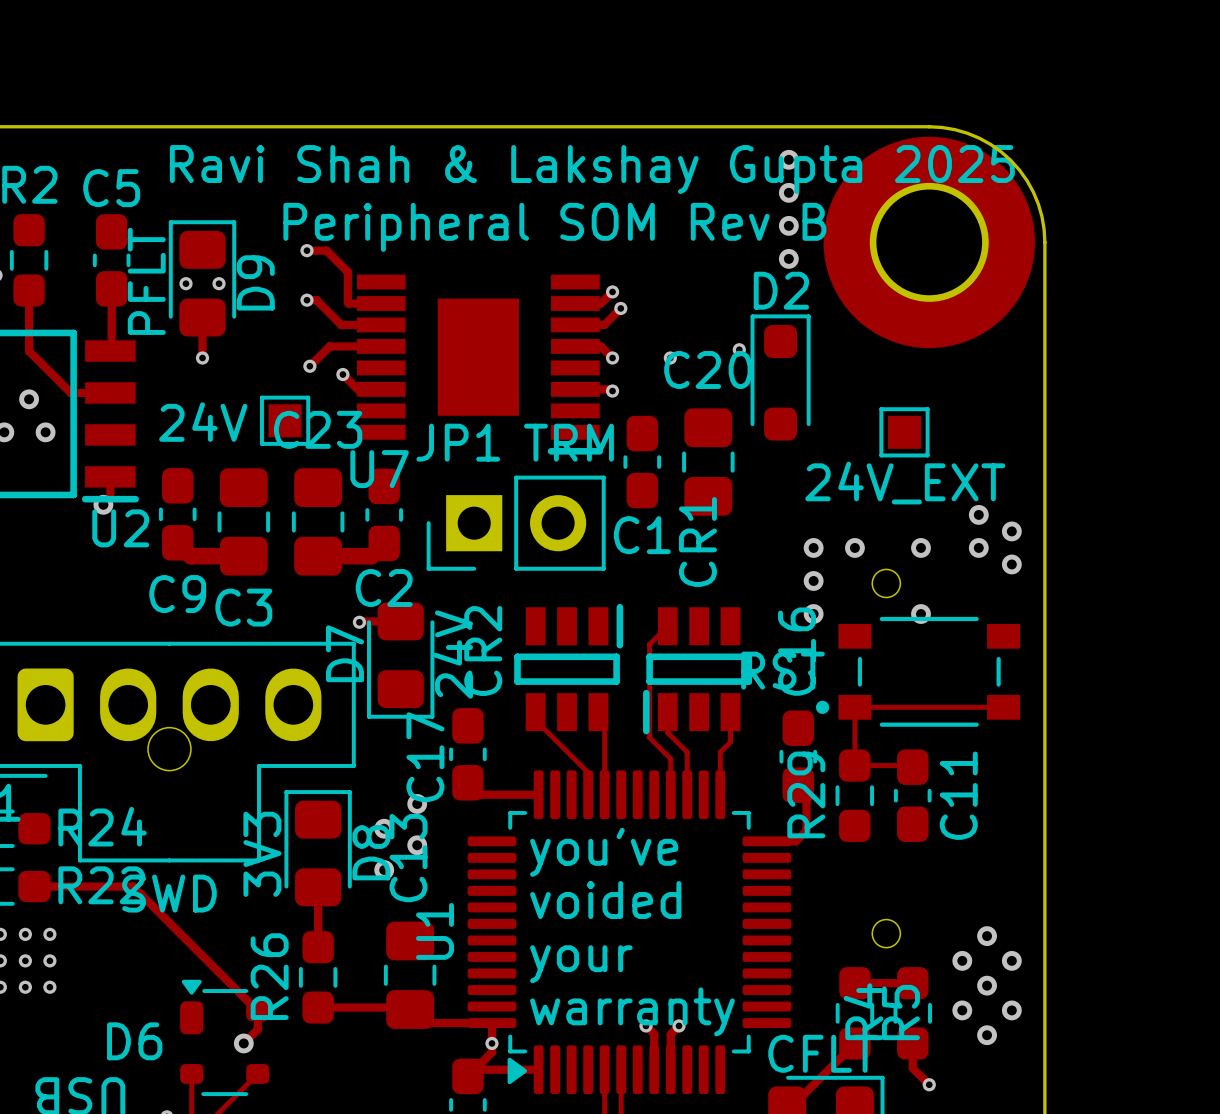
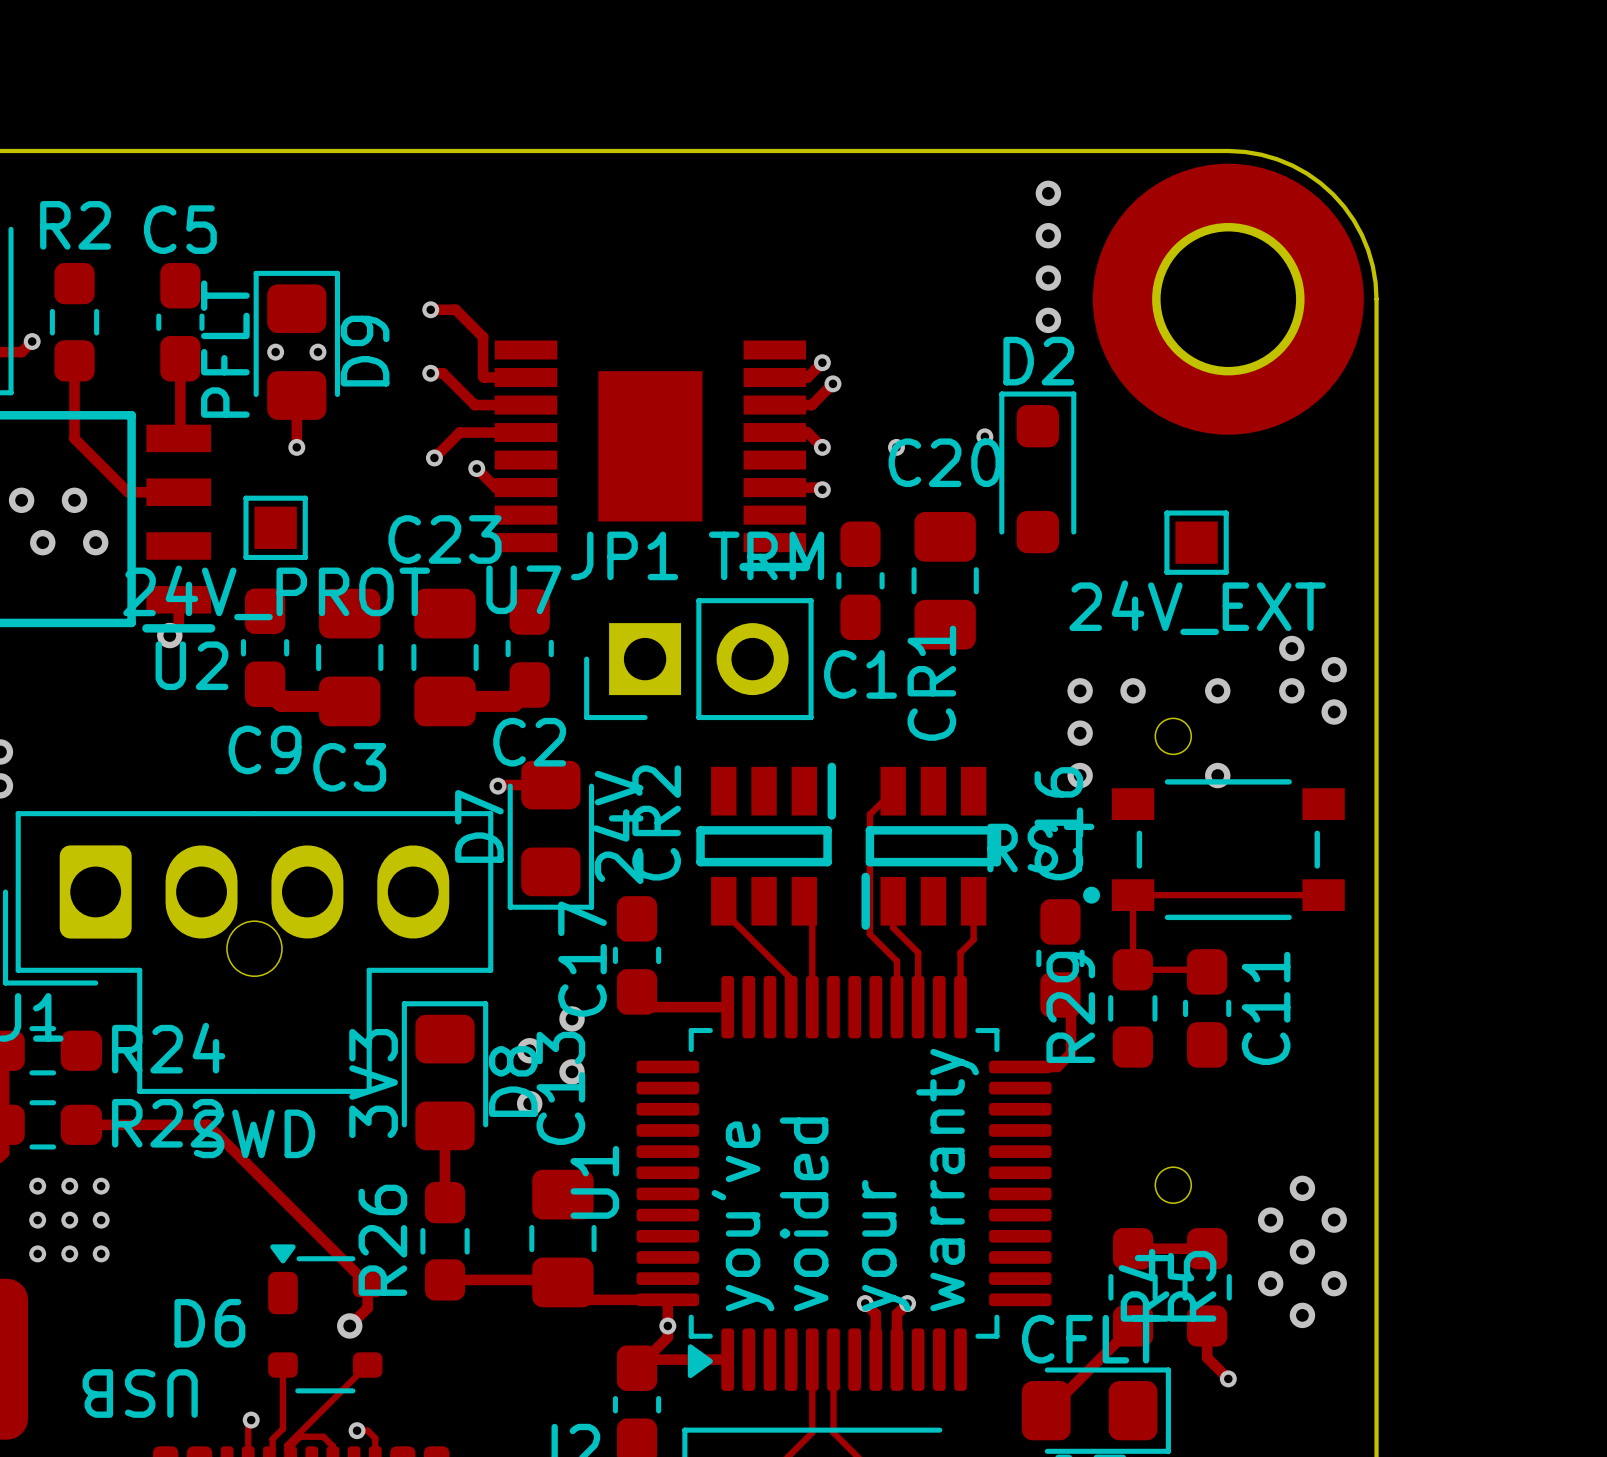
text: Ravi Shah & Lakshay Gupta 2025 (592, 169) -> none
text: Peripheral SOM Rev B (554, 227) -> none
part: none -> 24V_PROT (275, 527)
part: 24V (285, 420) -> none
text rotation: 0° (604, 852) -> 90° counterclockwise (743, 1216)
text rotation: 0° (605, 900) -> 90° counterclockwise (804, 1214)
text rotation: 0° (581, 964) -> 90° counterclockwise (886, 1245)
text rotation: 0° (632, 1011) -> 90° counterclockwise (947, 1180)

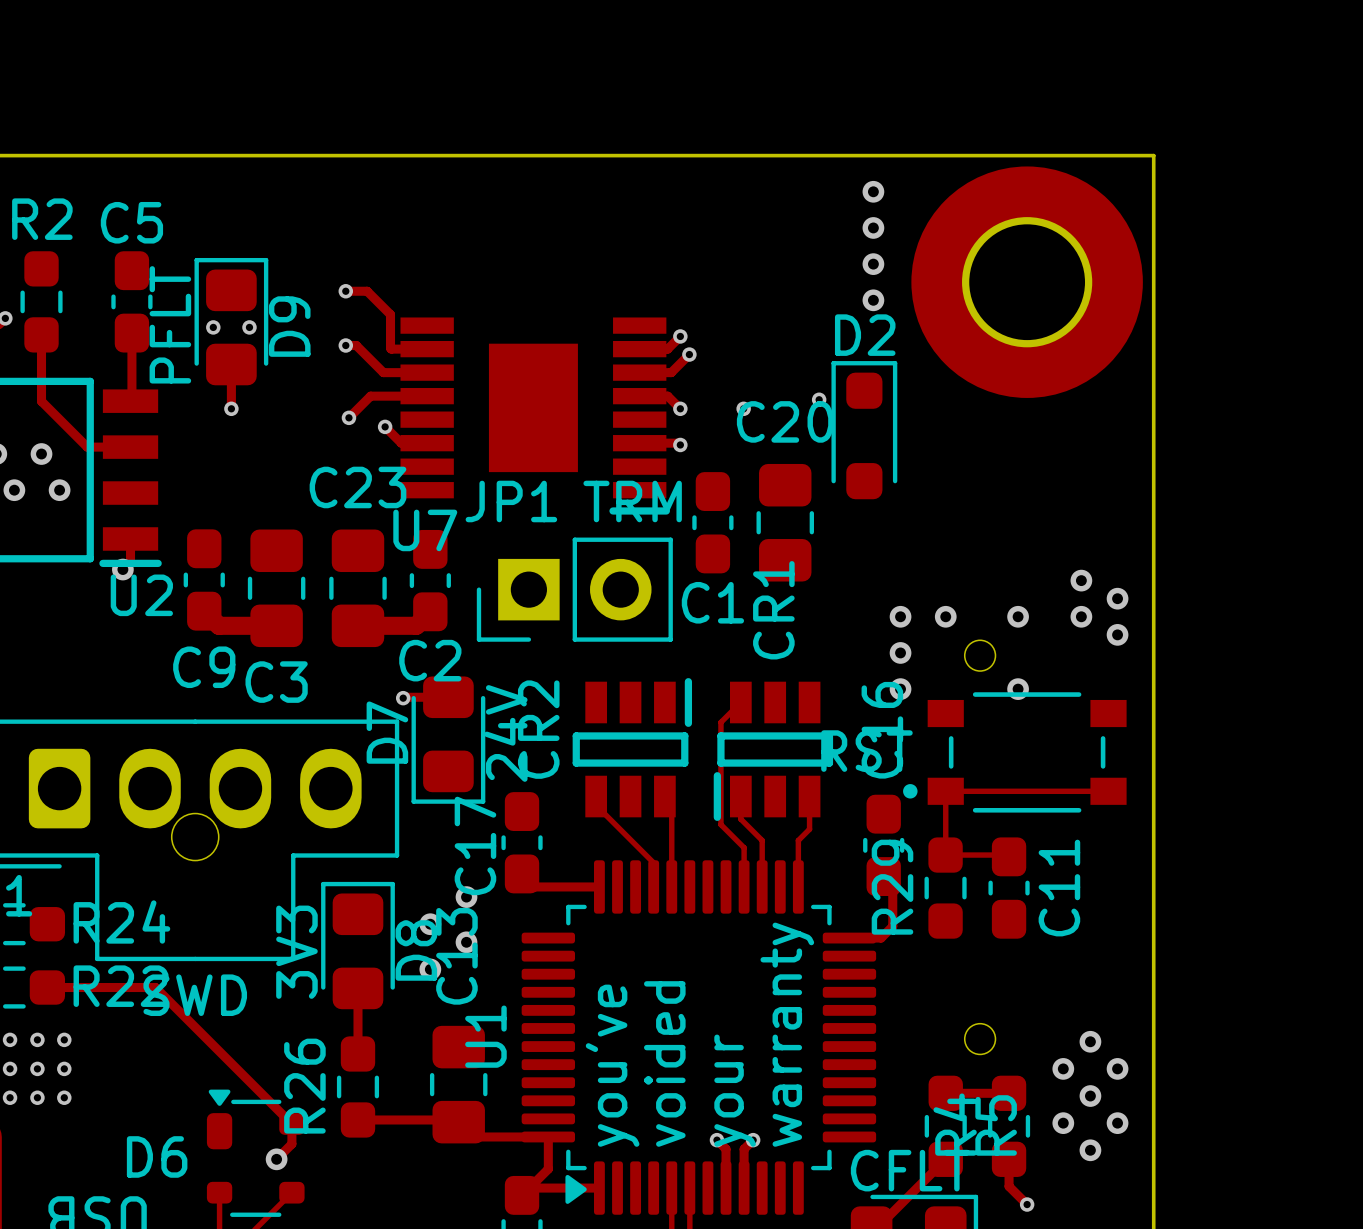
board edge: (1228, 150) (1244, 151) (1277, 159) (1307, 173) (1333, 194) (1353, 220) (1368, 250) (1375, 282) (1376, 299) -> (1027, 155) (1153, 155) (1153, 282)
part: 24V_PROT (275, 527) -> none
part: 24V_EXT (1196, 542) -> none
via: (667, 1325) -> none

